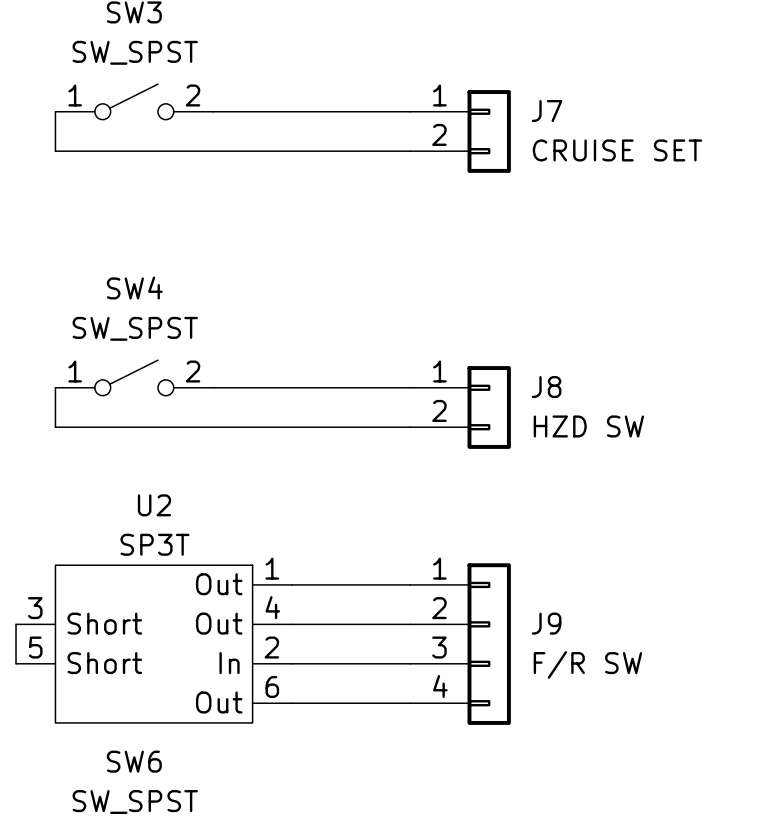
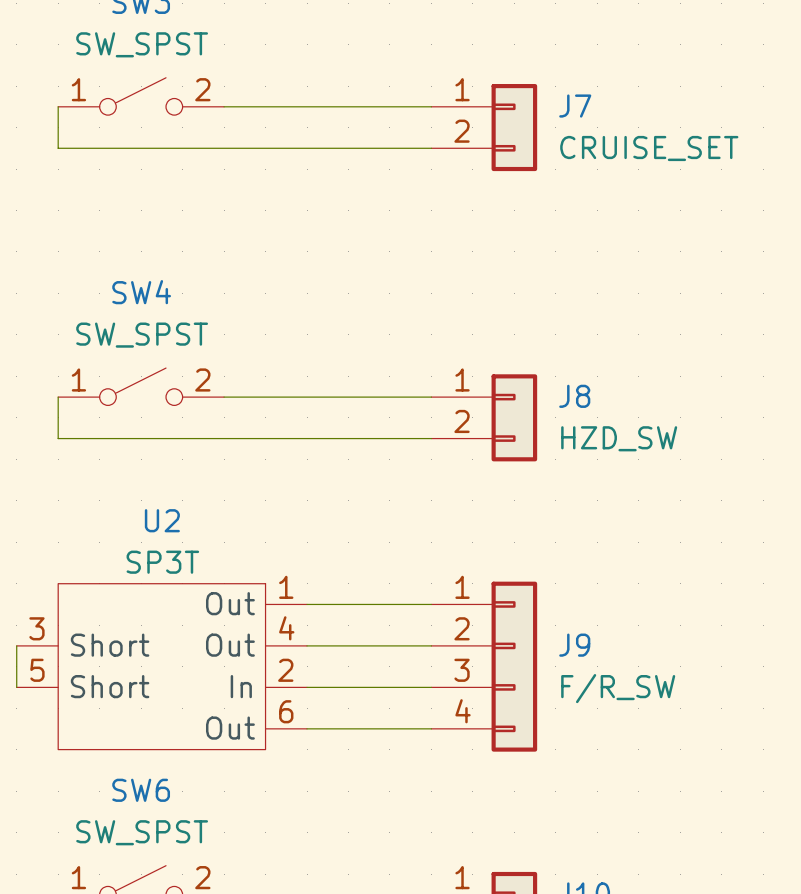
J7 value: CRUISE SET (617, 150) -> CRUISE_SET (649, 148)
J8 value: HZD SW (588, 426) -> HZD_SW (619, 438)
J9 value: F/R SW (587, 664) -> F/R_SW (618, 688)

